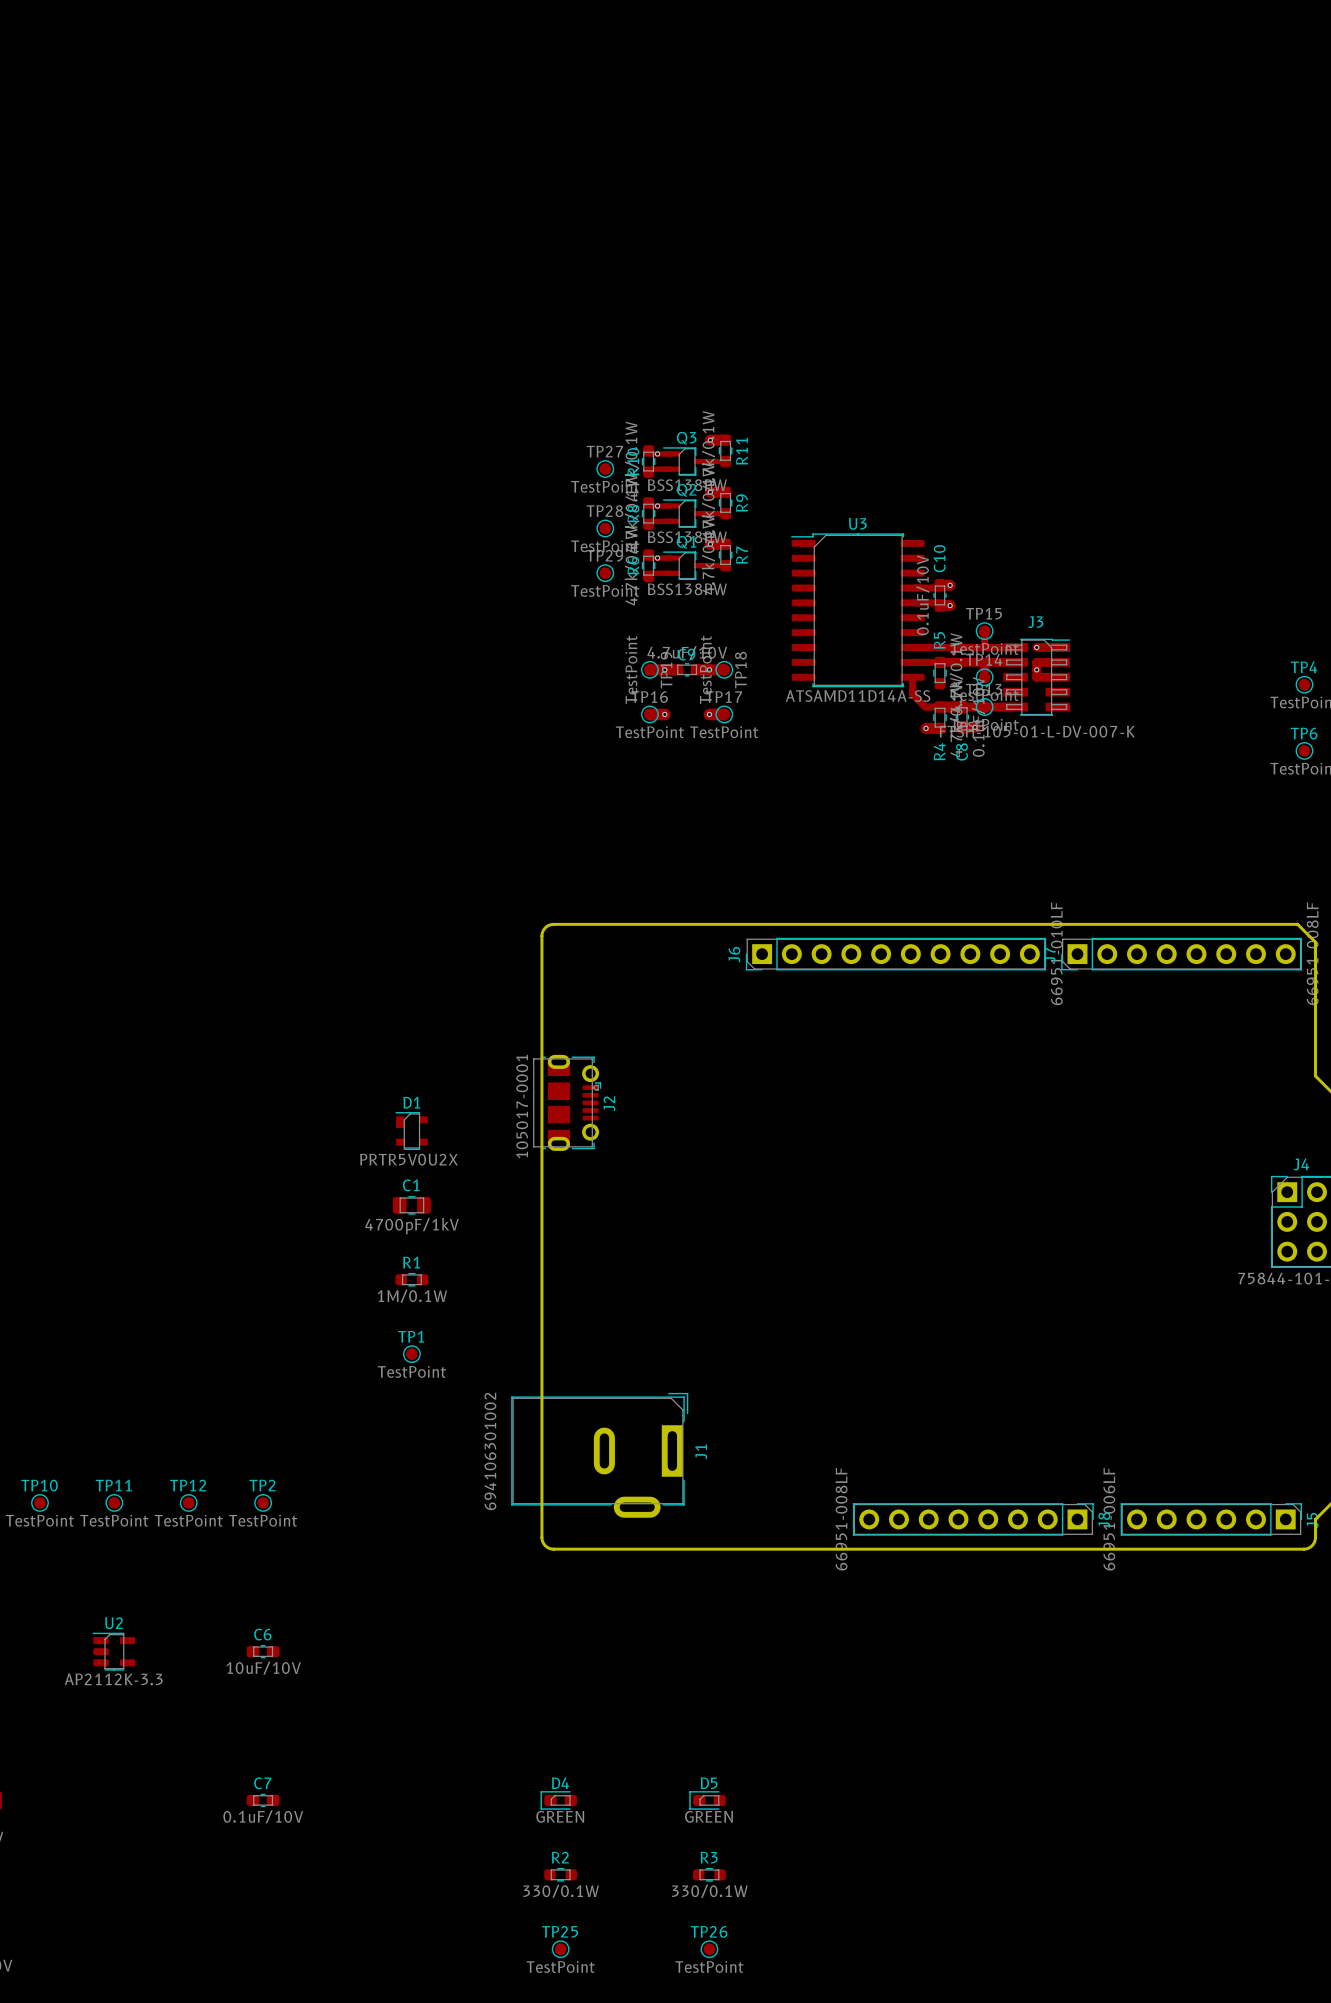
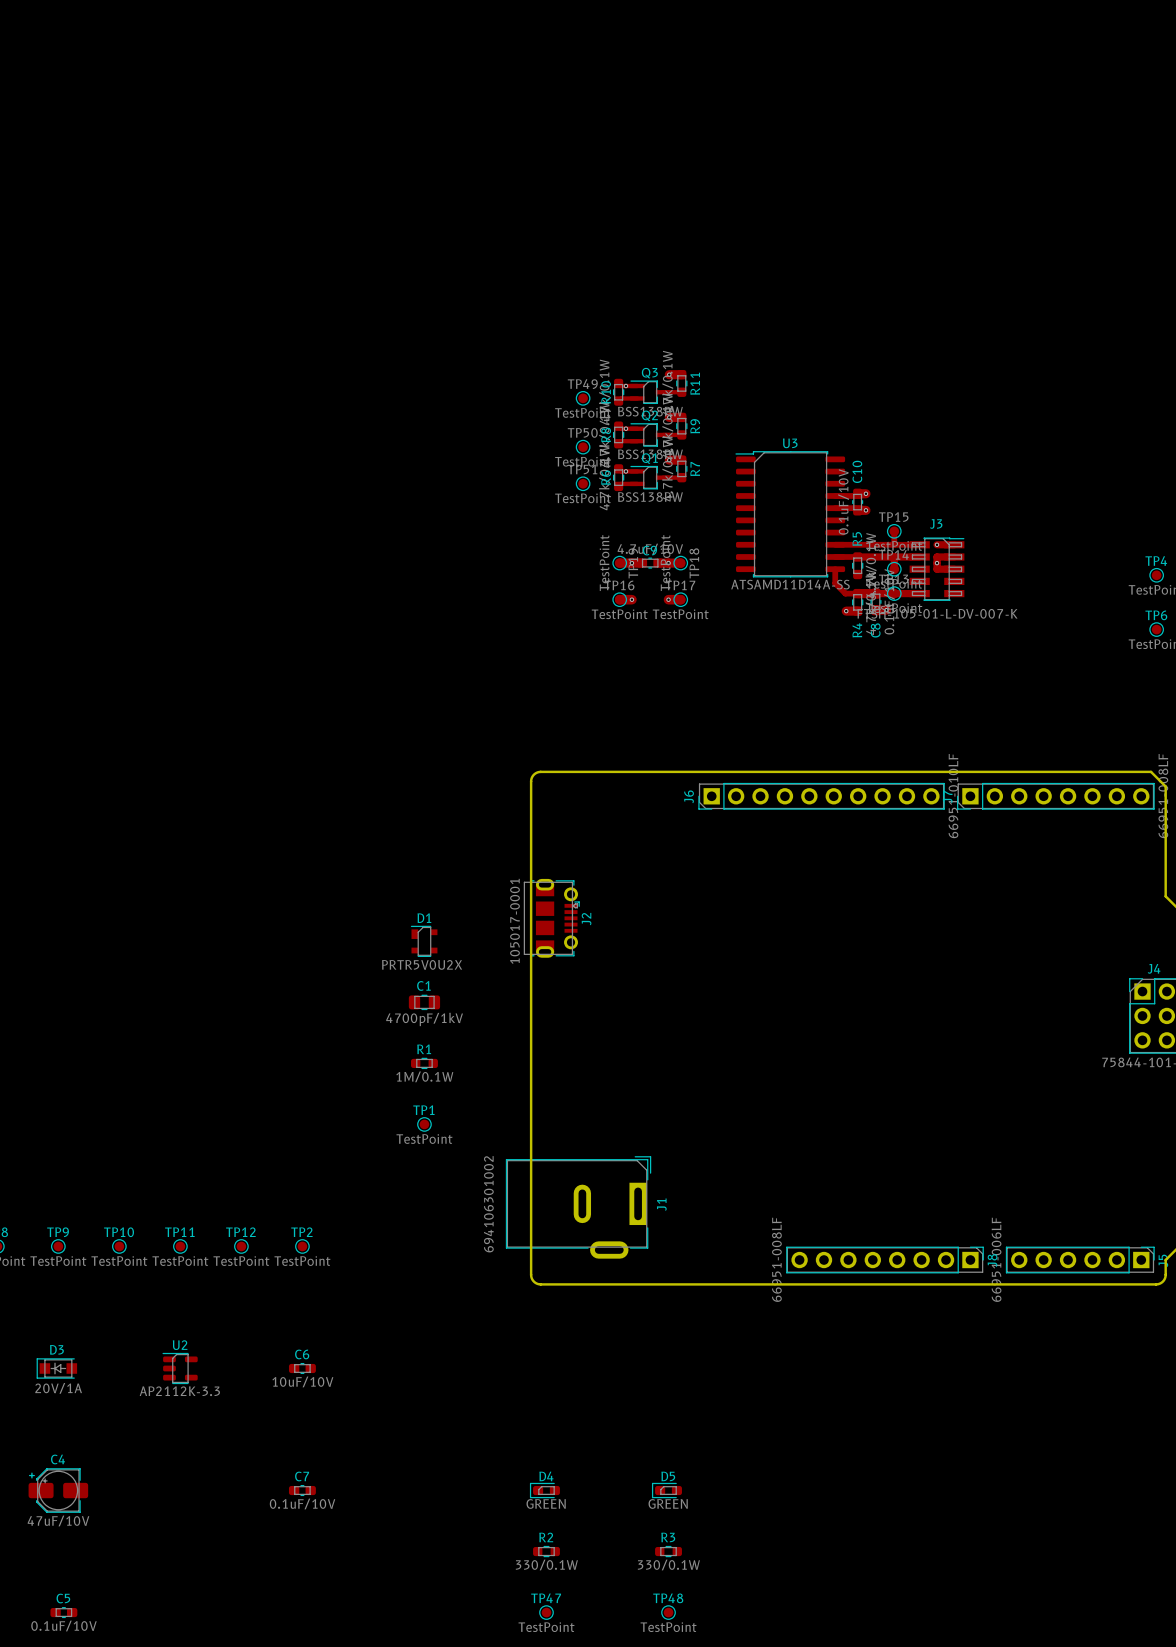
TP27 name: TP27 (604, 451) -> TP49 (582, 384)
TP28 name: TP28 (604, 511) -> TP50 (582, 432)
TP29 name: TP29 (604, 555) -> TP51 (582, 469)
TP25 name: TP25 (560, 1931) -> TP47 (546, 1598)
TP26 name: TP26 (709, 1931) -> TP48 (668, 1598)

